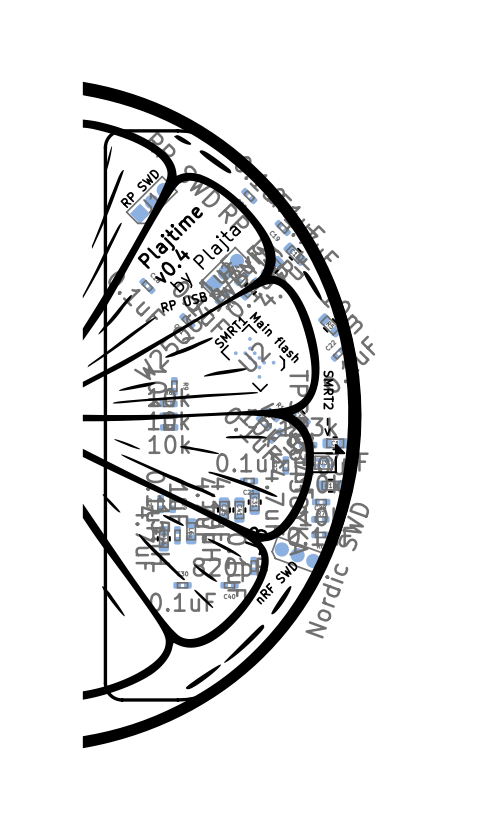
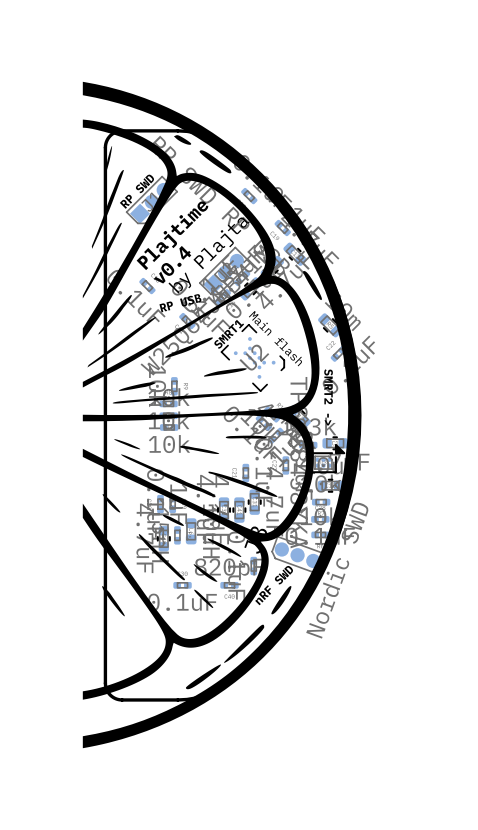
part rotation: 0° (249, 481) -> 90° clockwise (245, 473)

